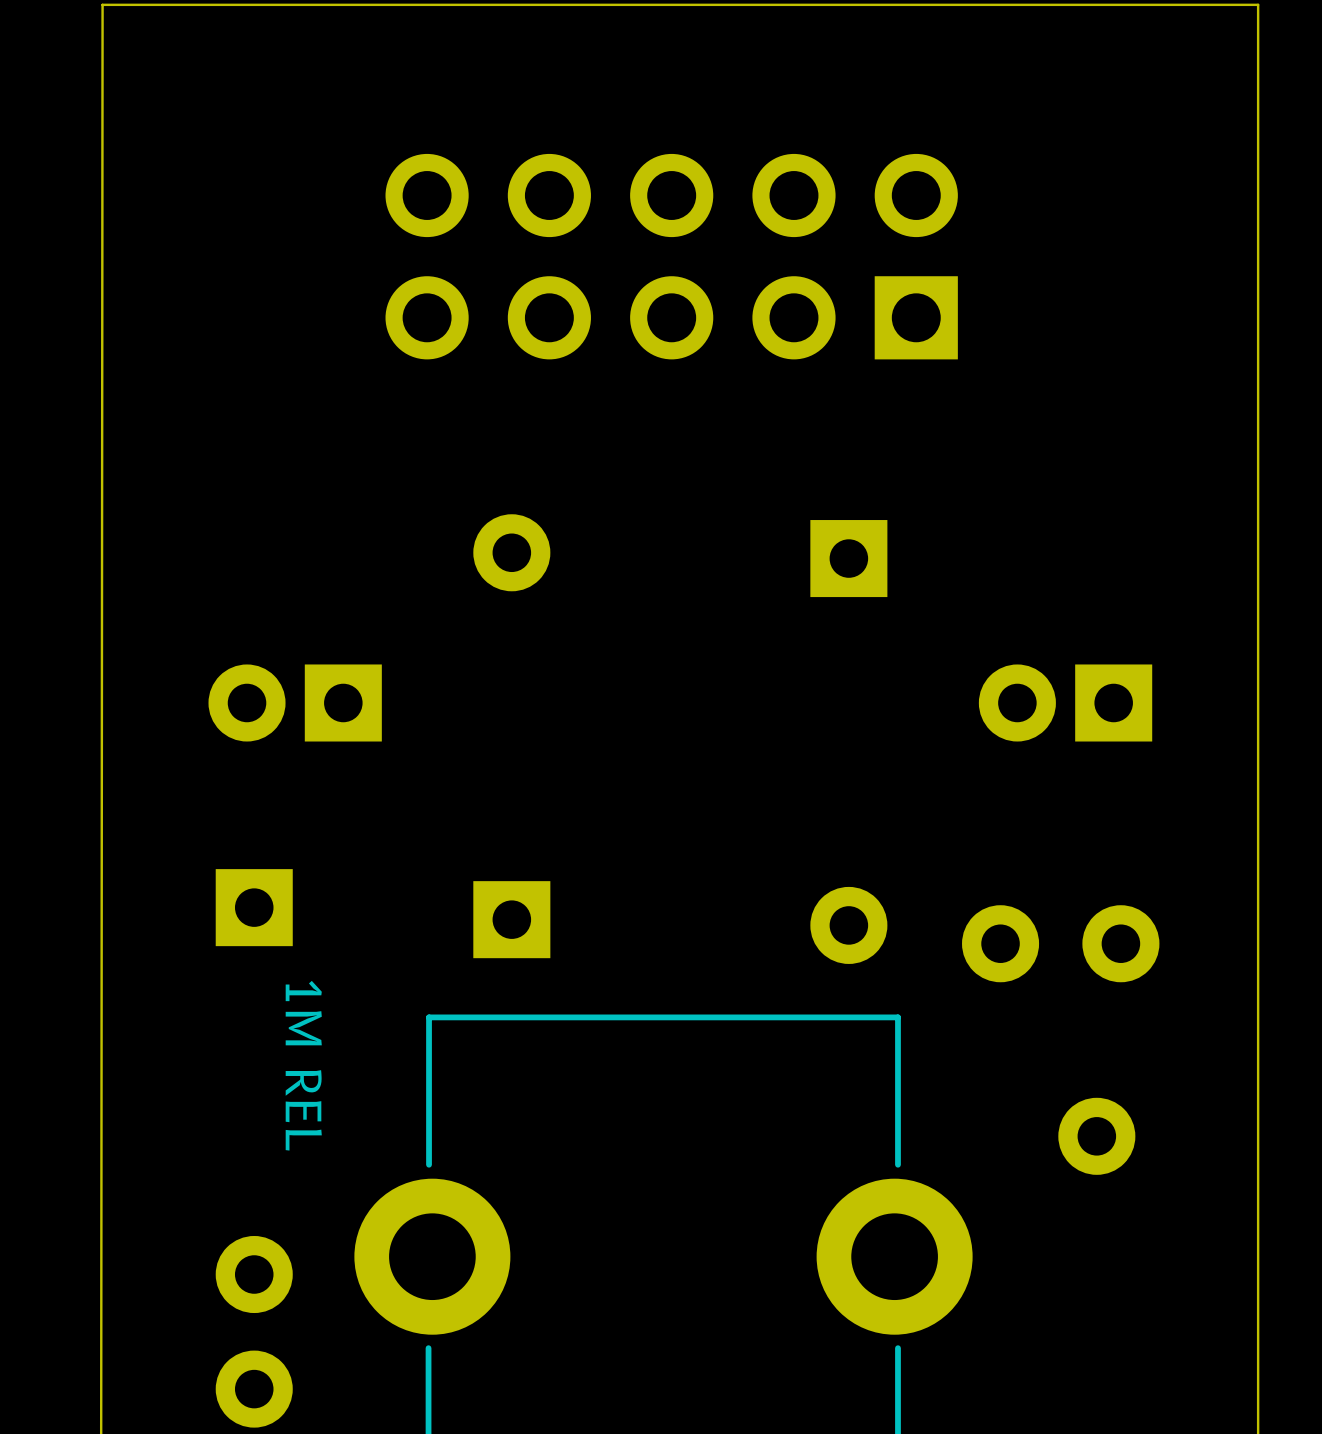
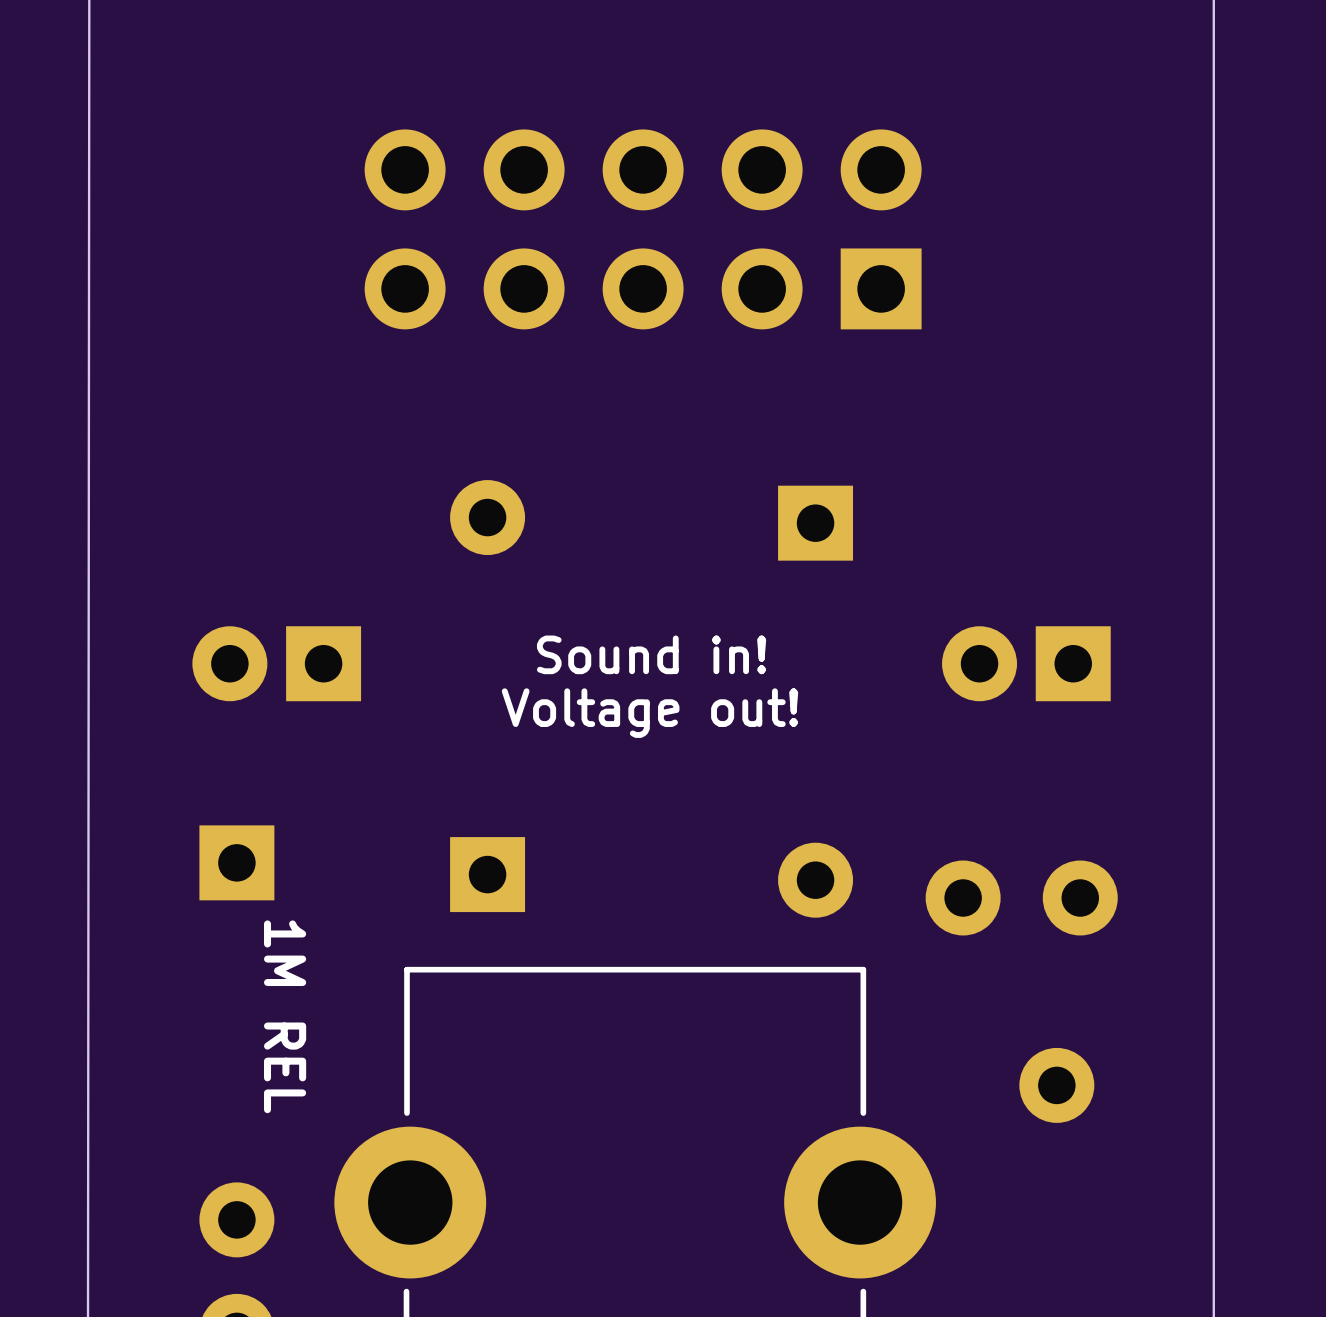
text: none -> Sound in! (651, 654)
text: none -> Voltage out! (650, 713)

